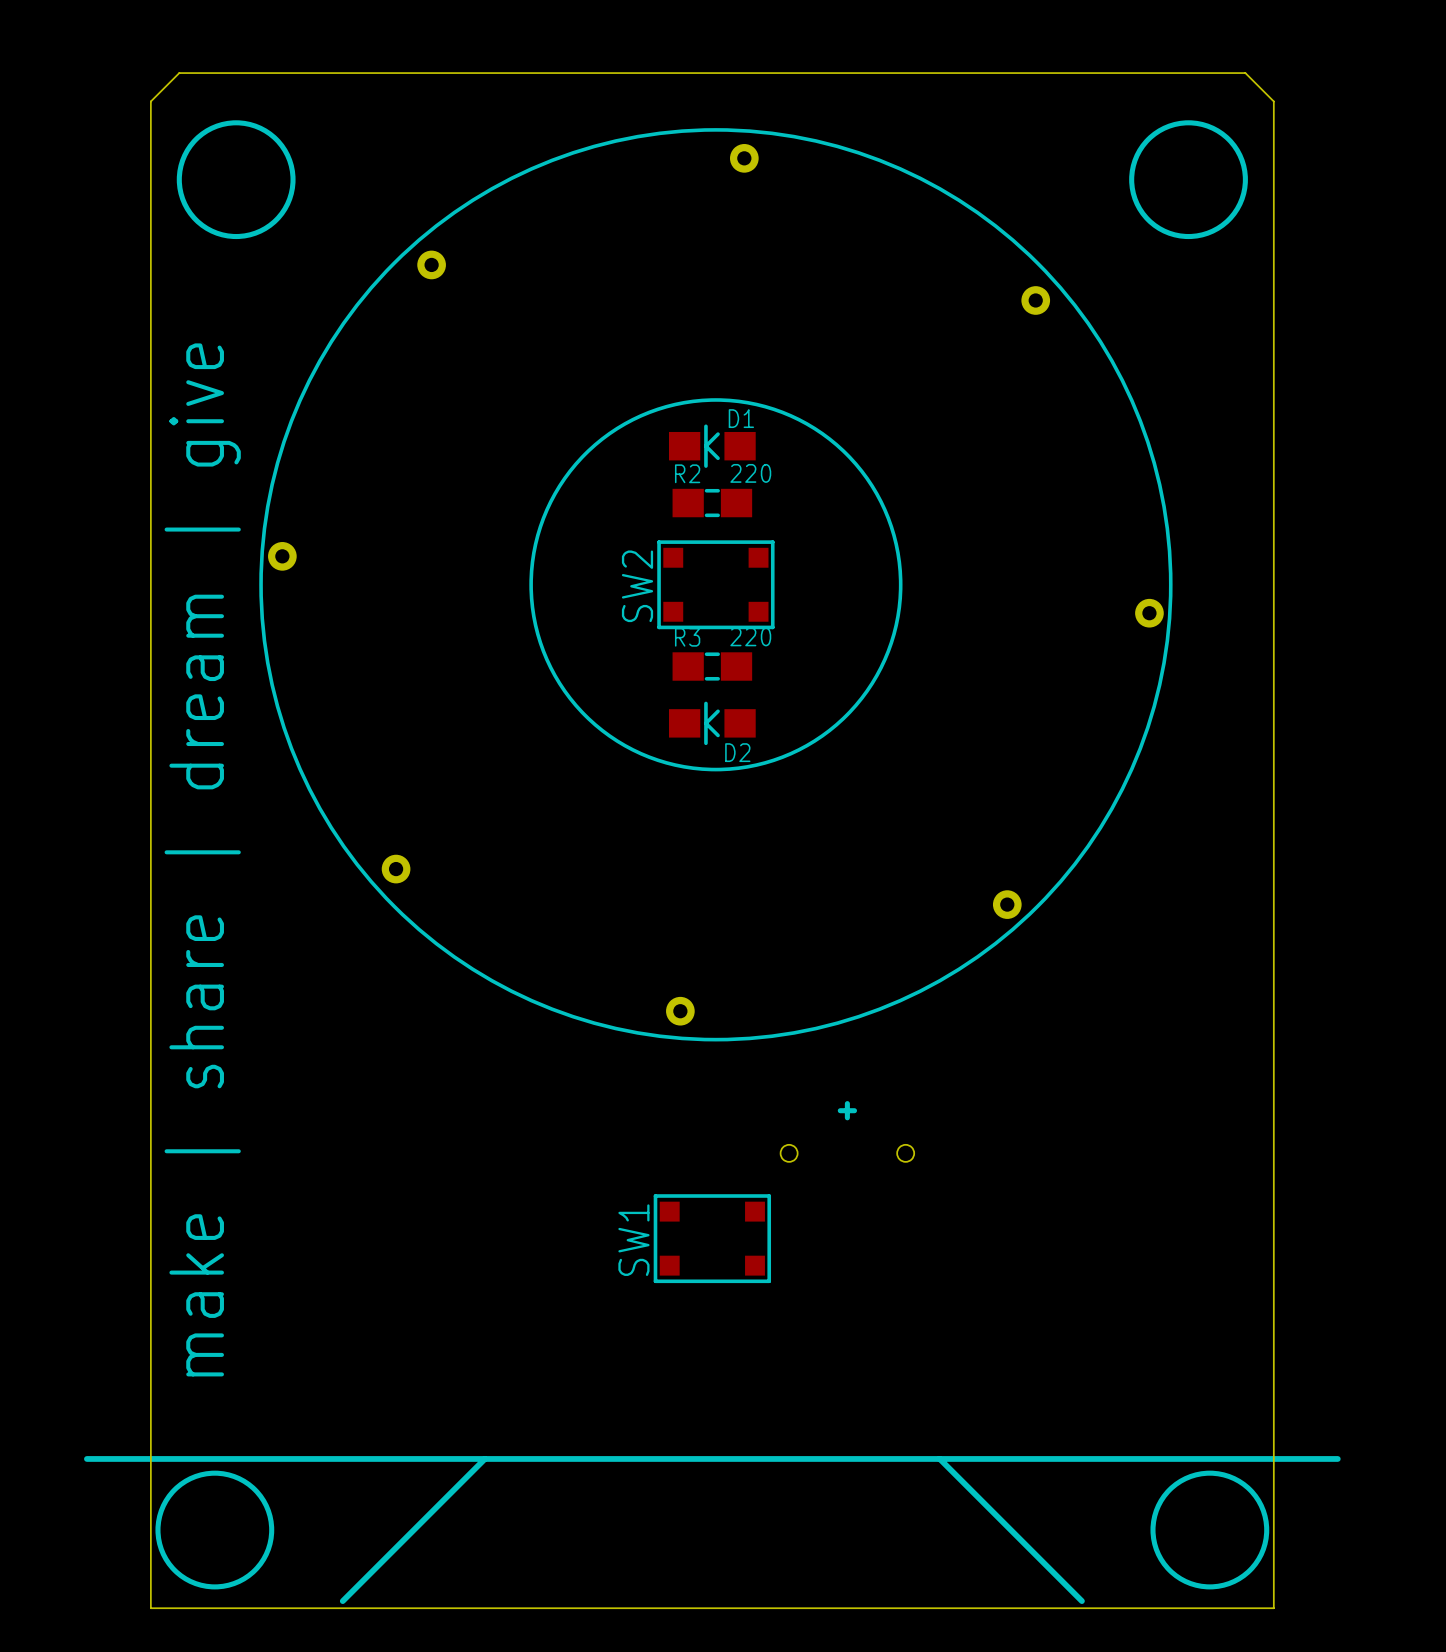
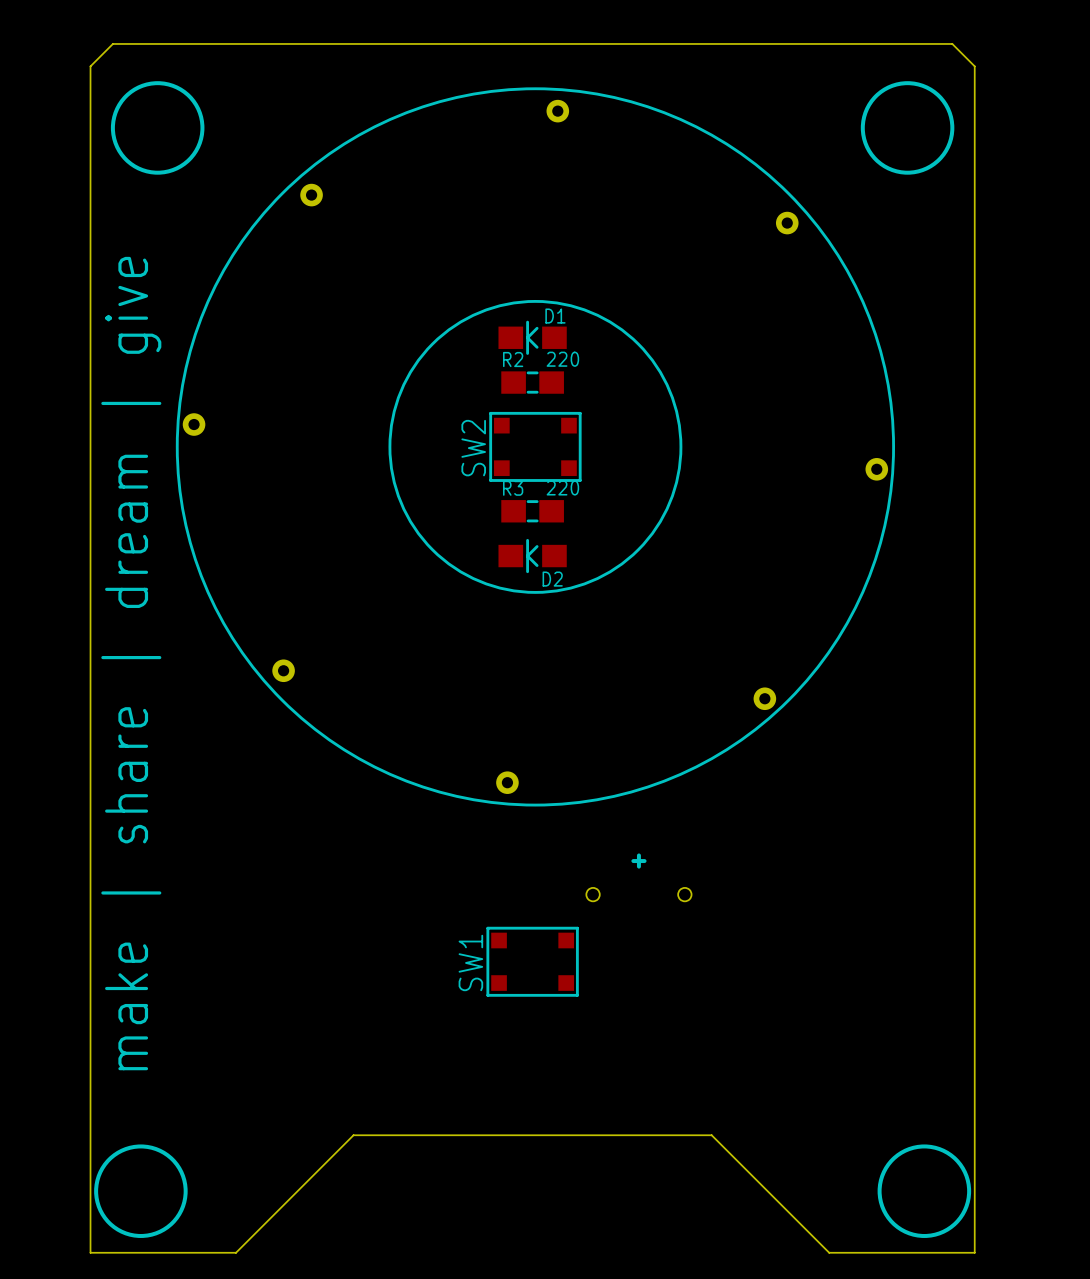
line: (86, 1458) (1337, 1458) -> none
line: (484, 1458) (342, 1601) -> none
line: (939, 1458) (1081, 1601) -> none
board edge: (335, 1608) (1089, 1608) -> (236, 1252) (353, 1135) (711, 1135) (829, 1252)

